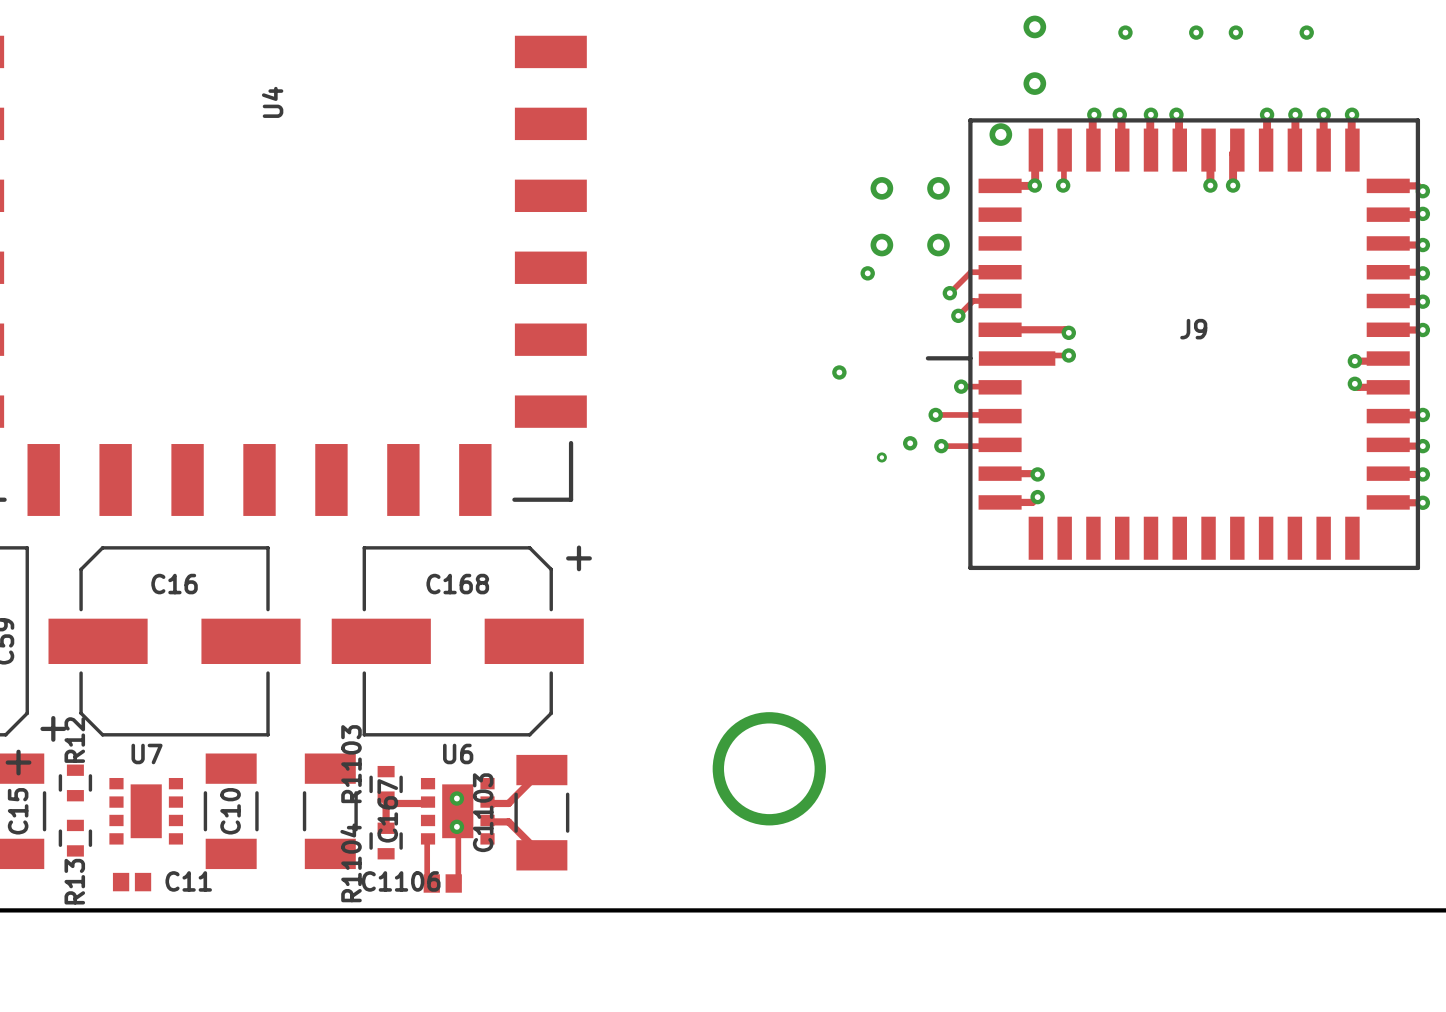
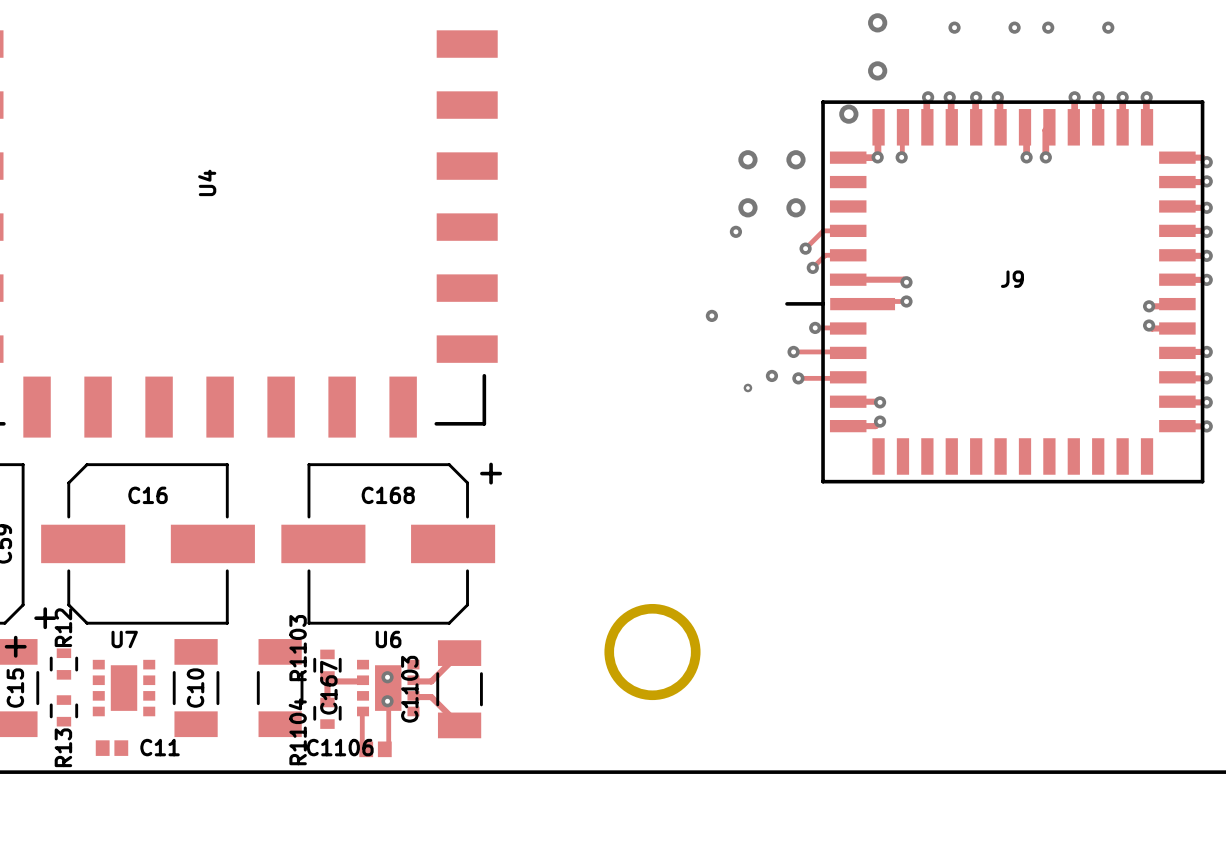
U4 name position: U4 (272, 102) -> U4 (207, 182)

